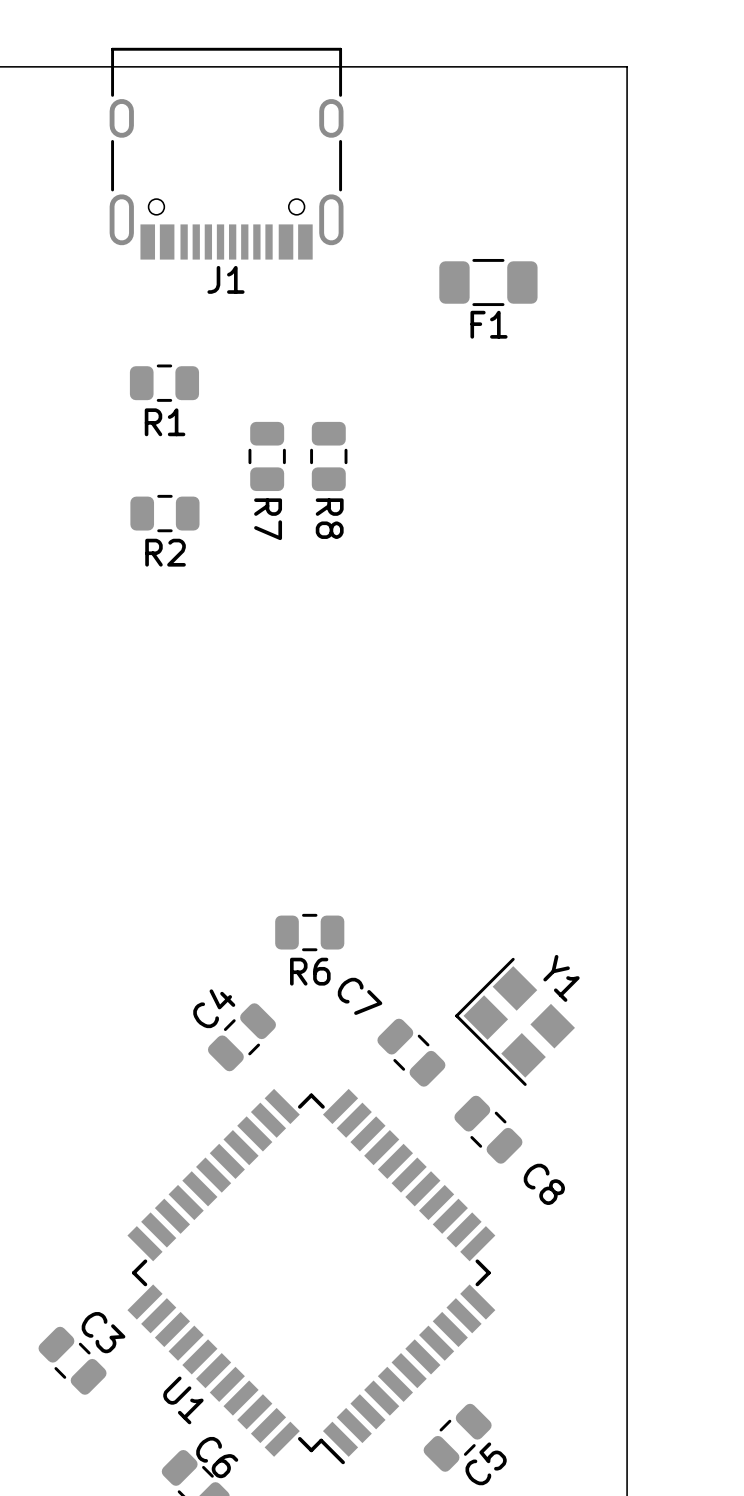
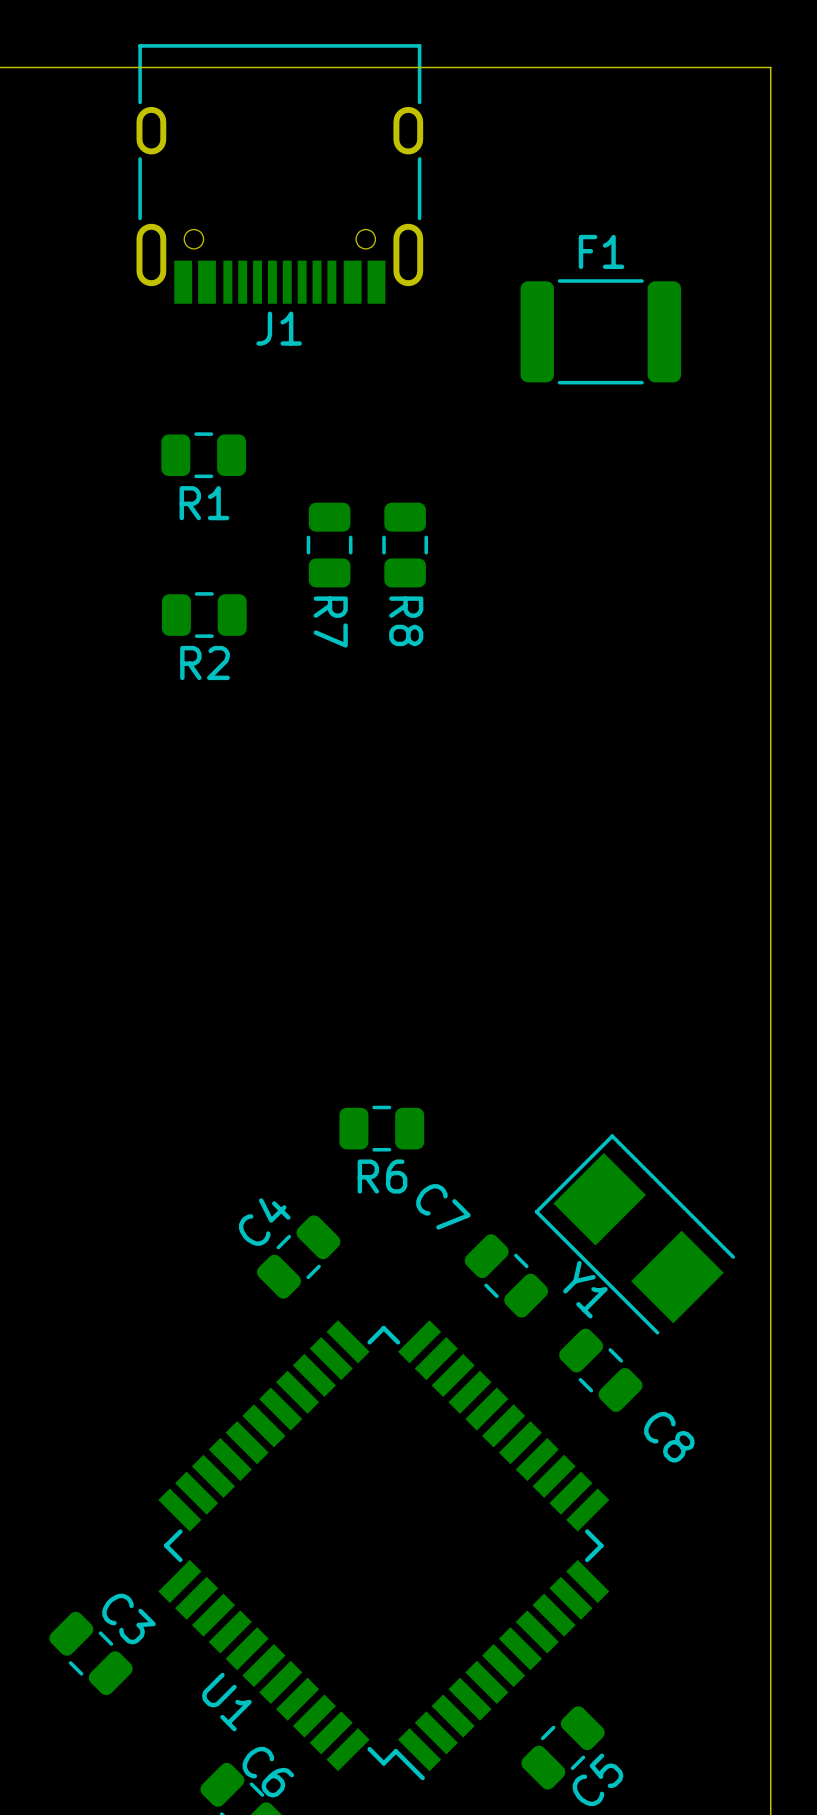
F1 footprint: [439, 258, 538, 307] -> [520, 279, 682, 385]
F1 name position: F1 (489, 324) -> F1 (601, 251)
Y1 footprint: [455, 957, 575, 1086] -> [534, 1134, 735, 1335]
Y1 name position: Y1 (561, 978) -> Y1 (585, 1289)

